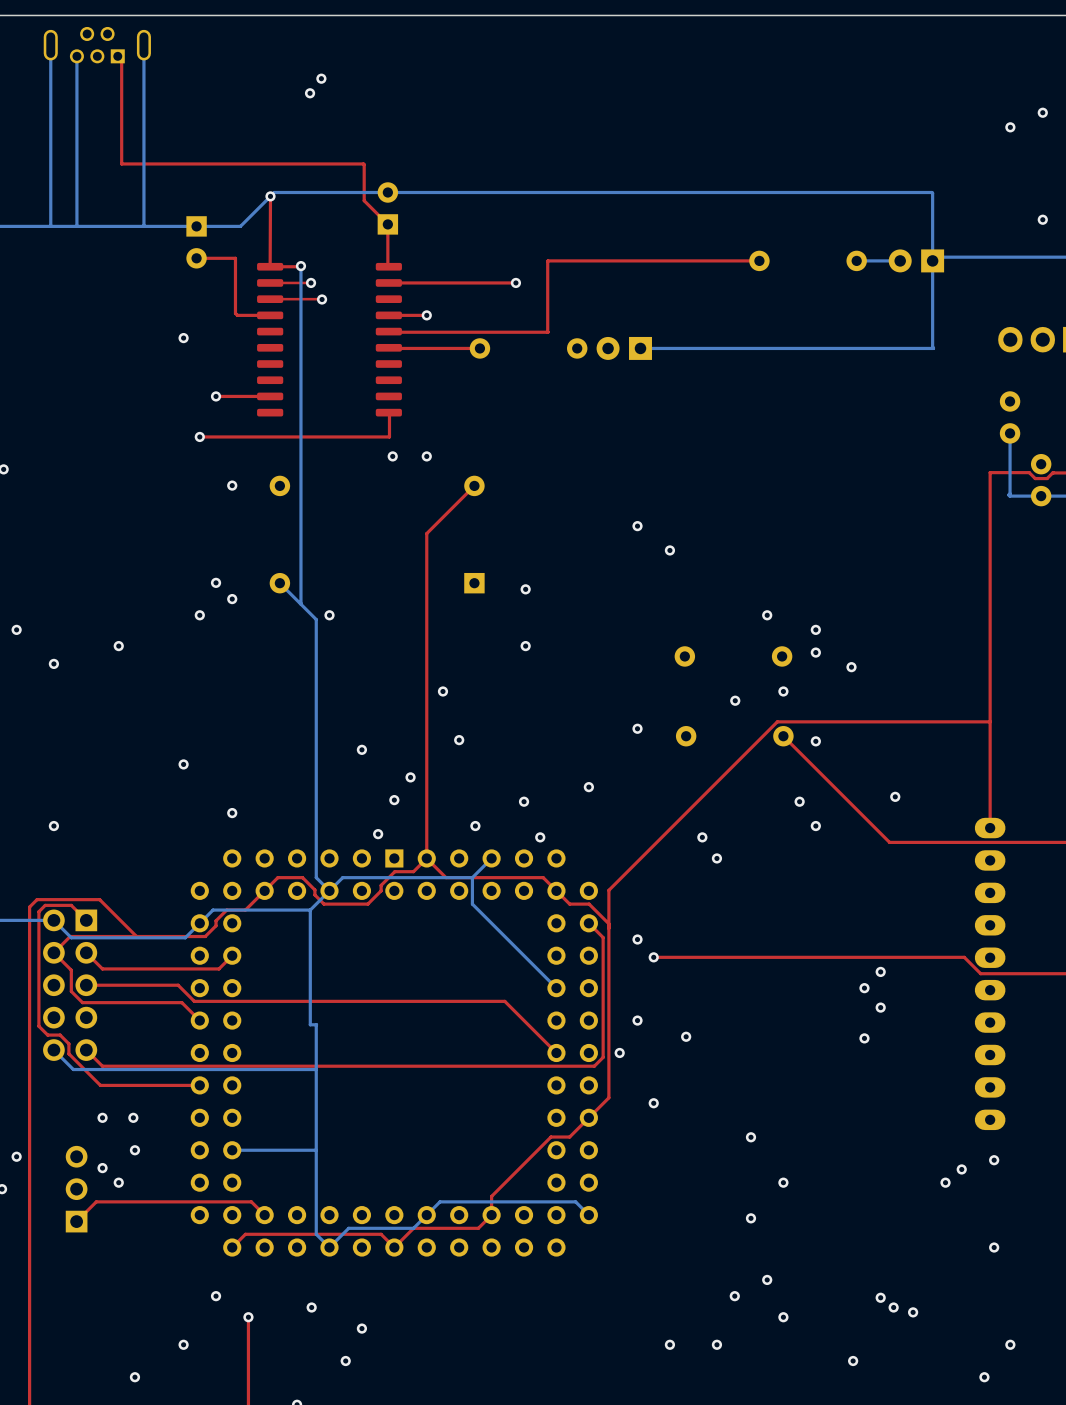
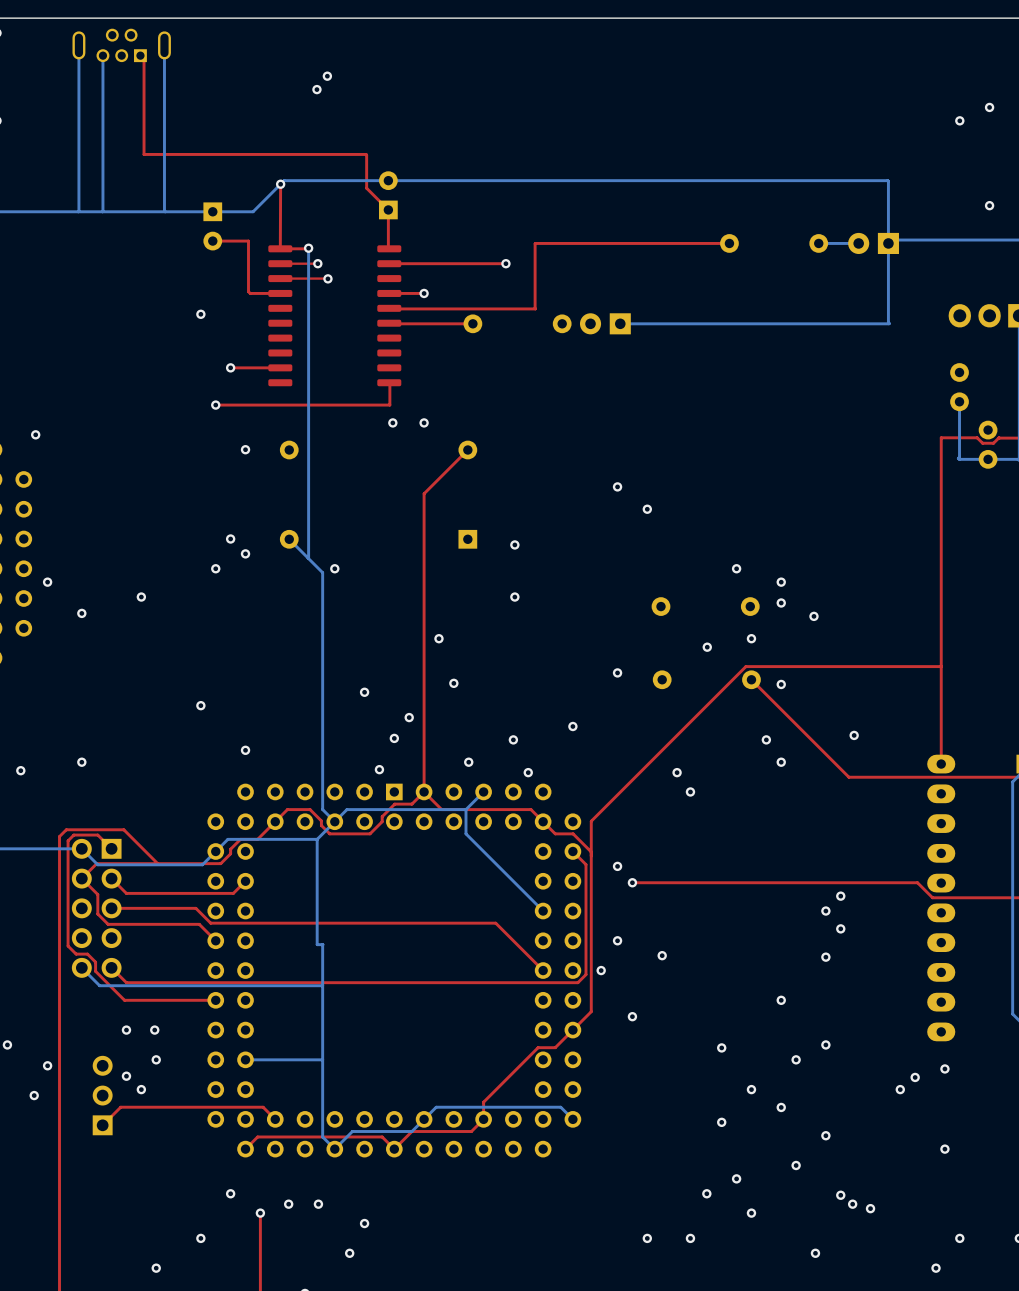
via: none -> (781, 1000)
via: none -> (825, 1044)
via: none -> (796, 1059)
via: none -> (781, 1107)
via: none -> (825, 1135)
via: none -> (796, 1165)
via: none -> (288, 1204)

